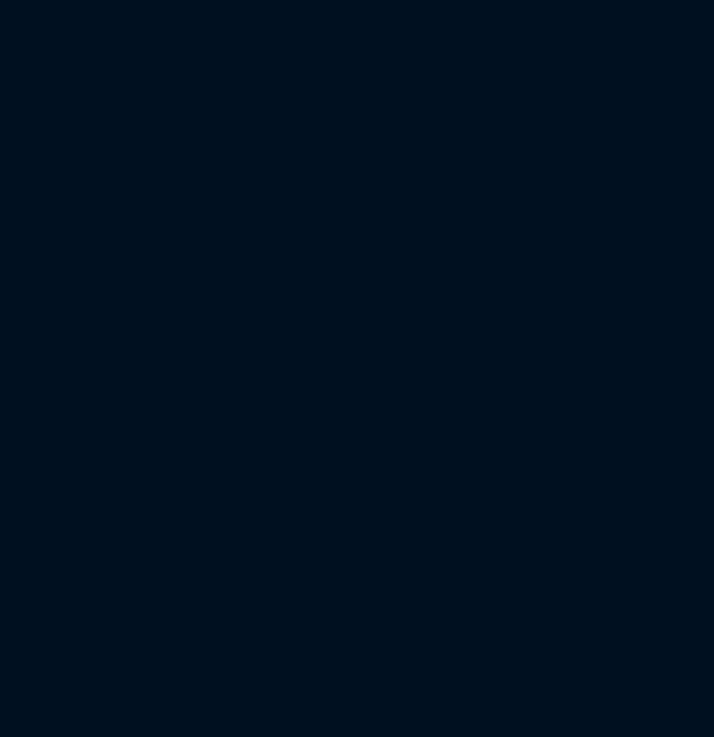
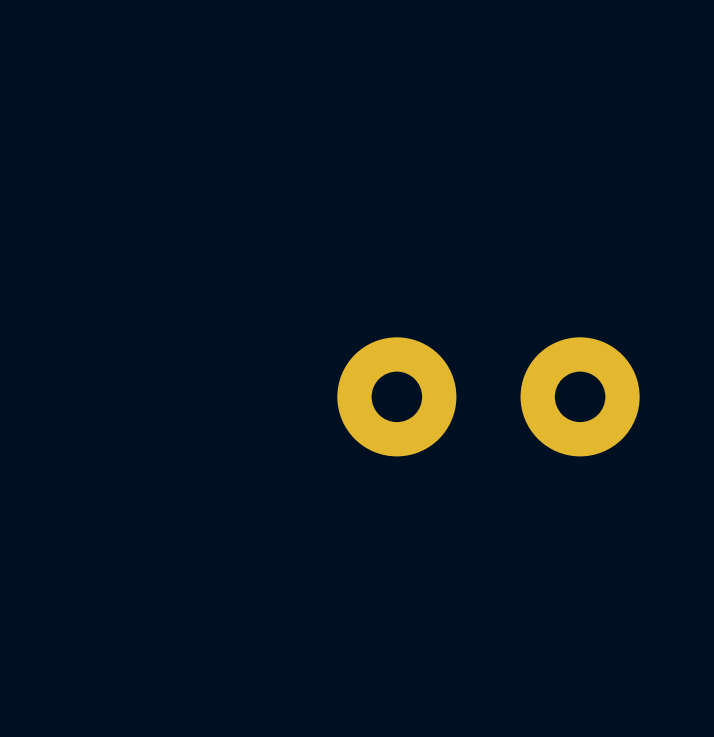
part: none -> (488, 396)

